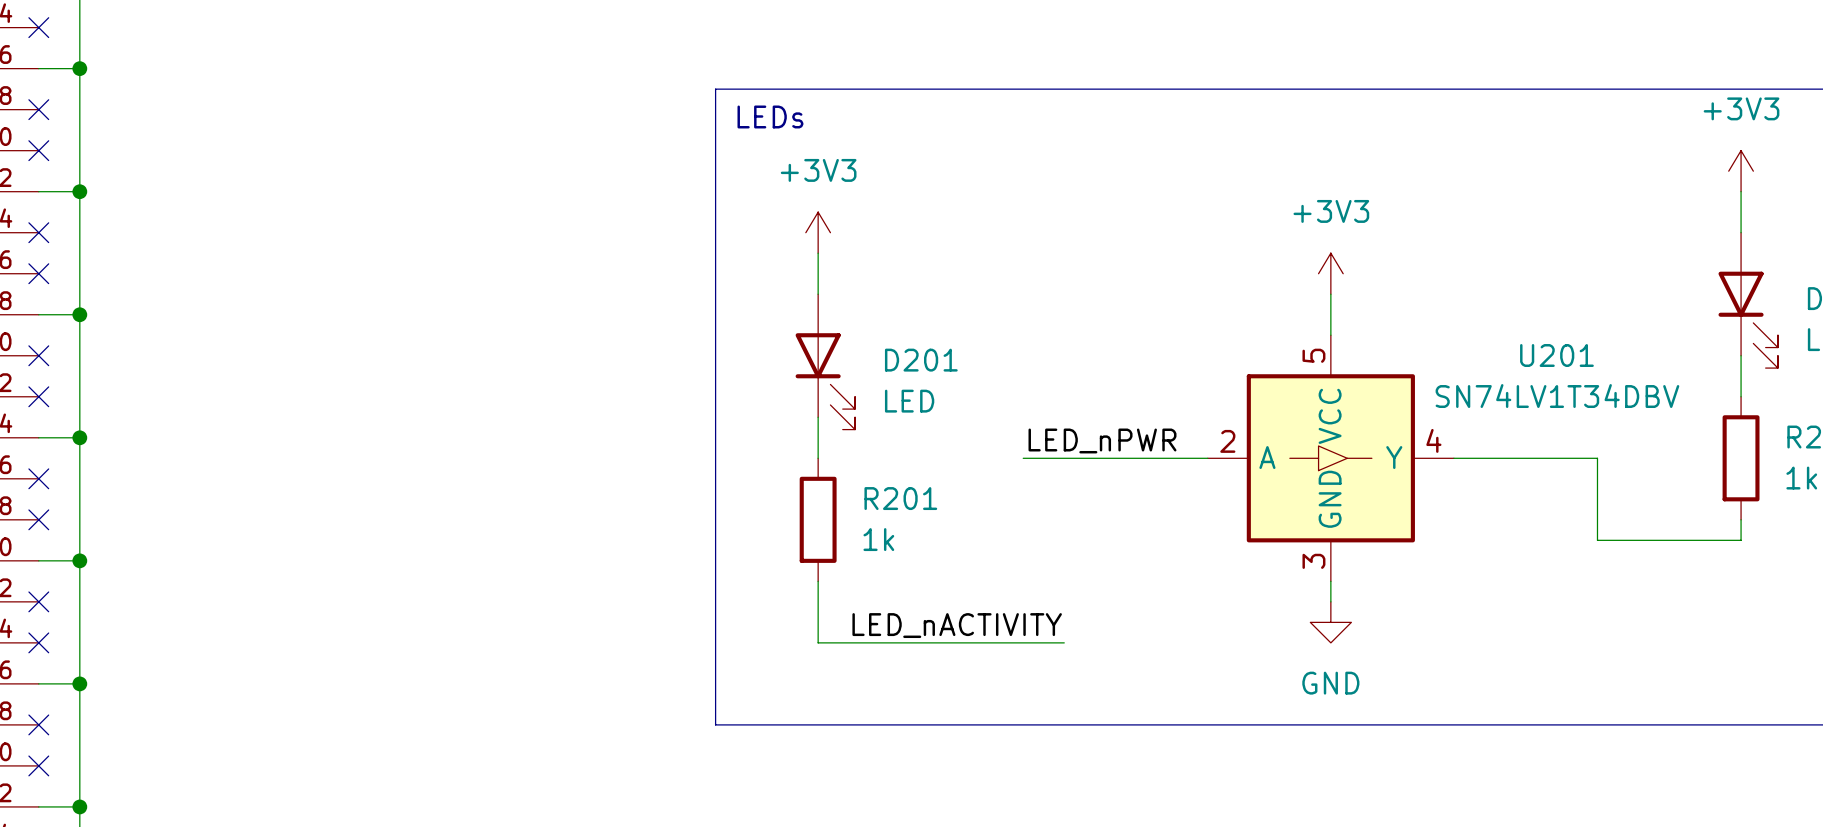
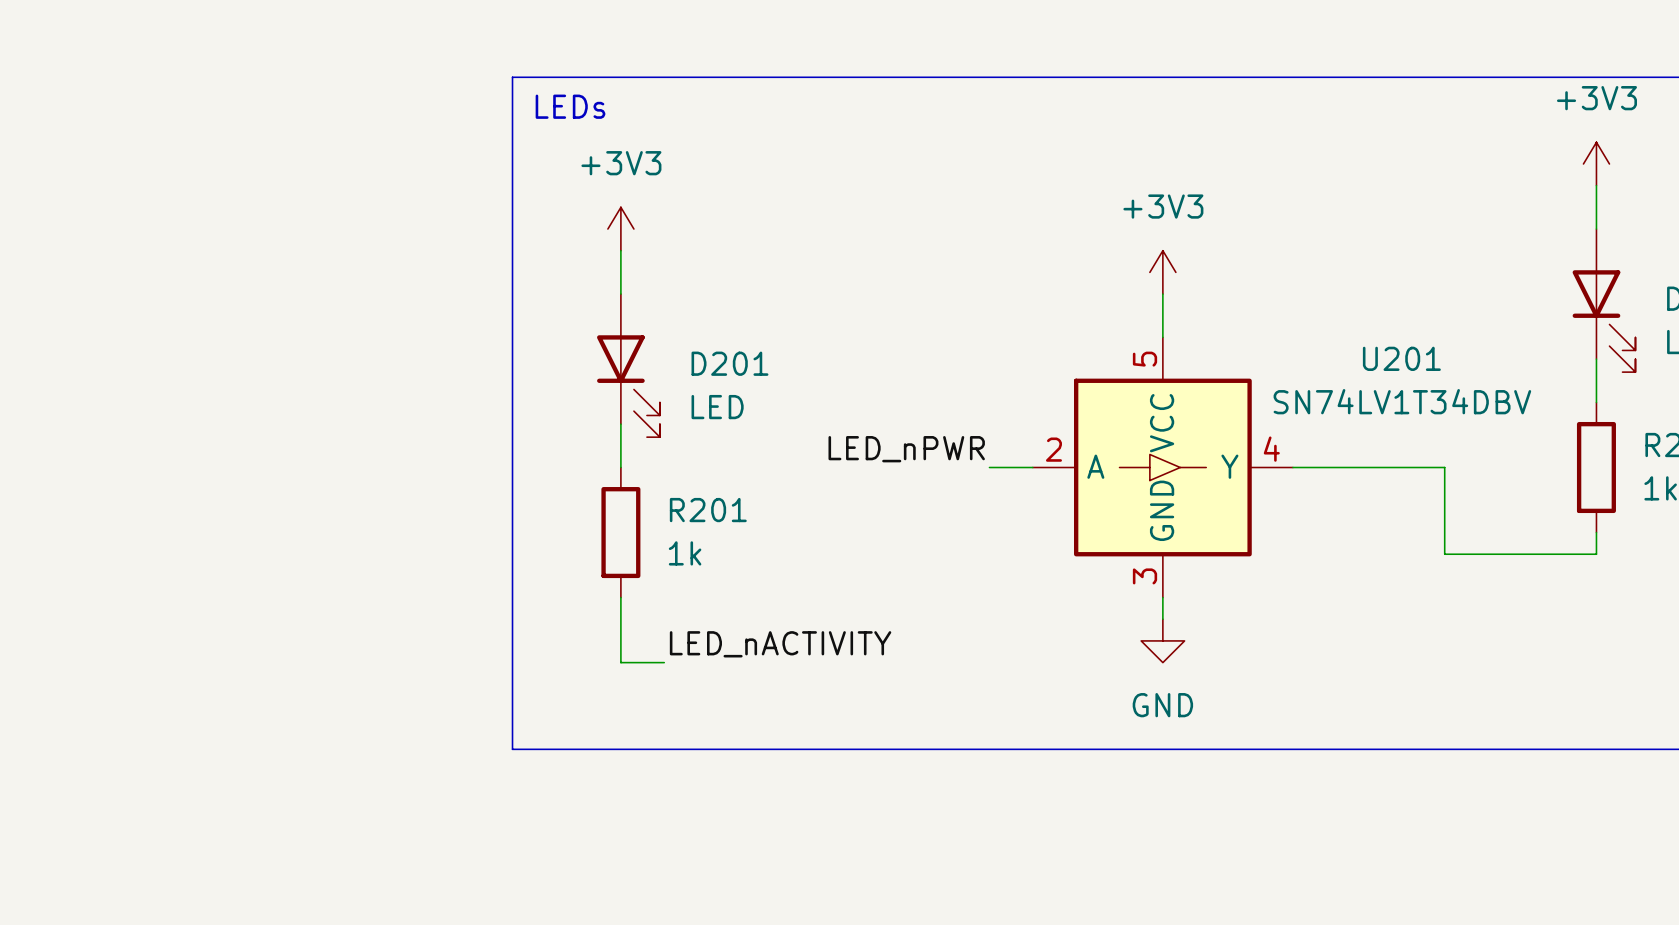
label position: LED_nPWR (1102, 440) -> LED_nPWR (906, 449)
wire: (1023, 458) (1166, 458) -> none
label position: LED_nACTIVITY (957, 625) -> LED_nACTIVITY (780, 644)
wire: (859, 642) (1064, 642) -> none

